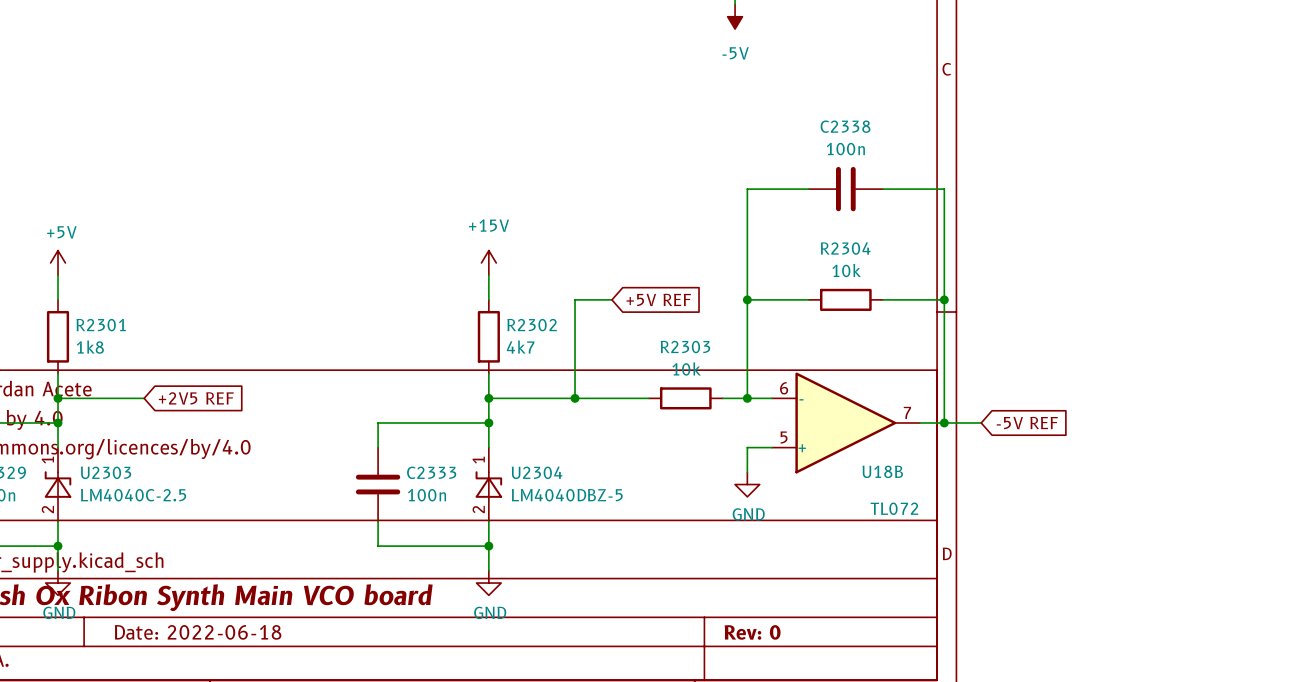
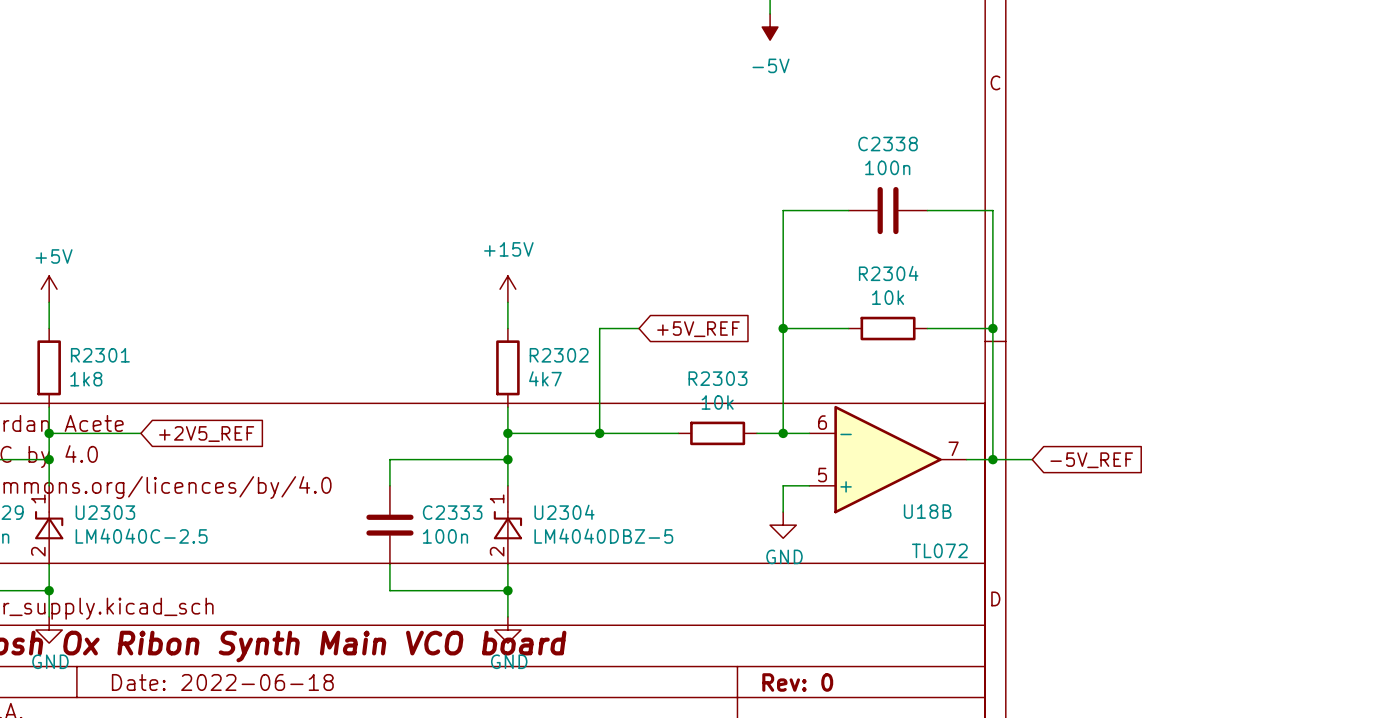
global label: +5V REF (658, 299) -> +5V_REF (698, 329)
global label: +2V5 REF (196, 398) -> +2V5_REF (206, 434)
global label: -5V REF (1027, 423) -> -5V_REF (1091, 460)

